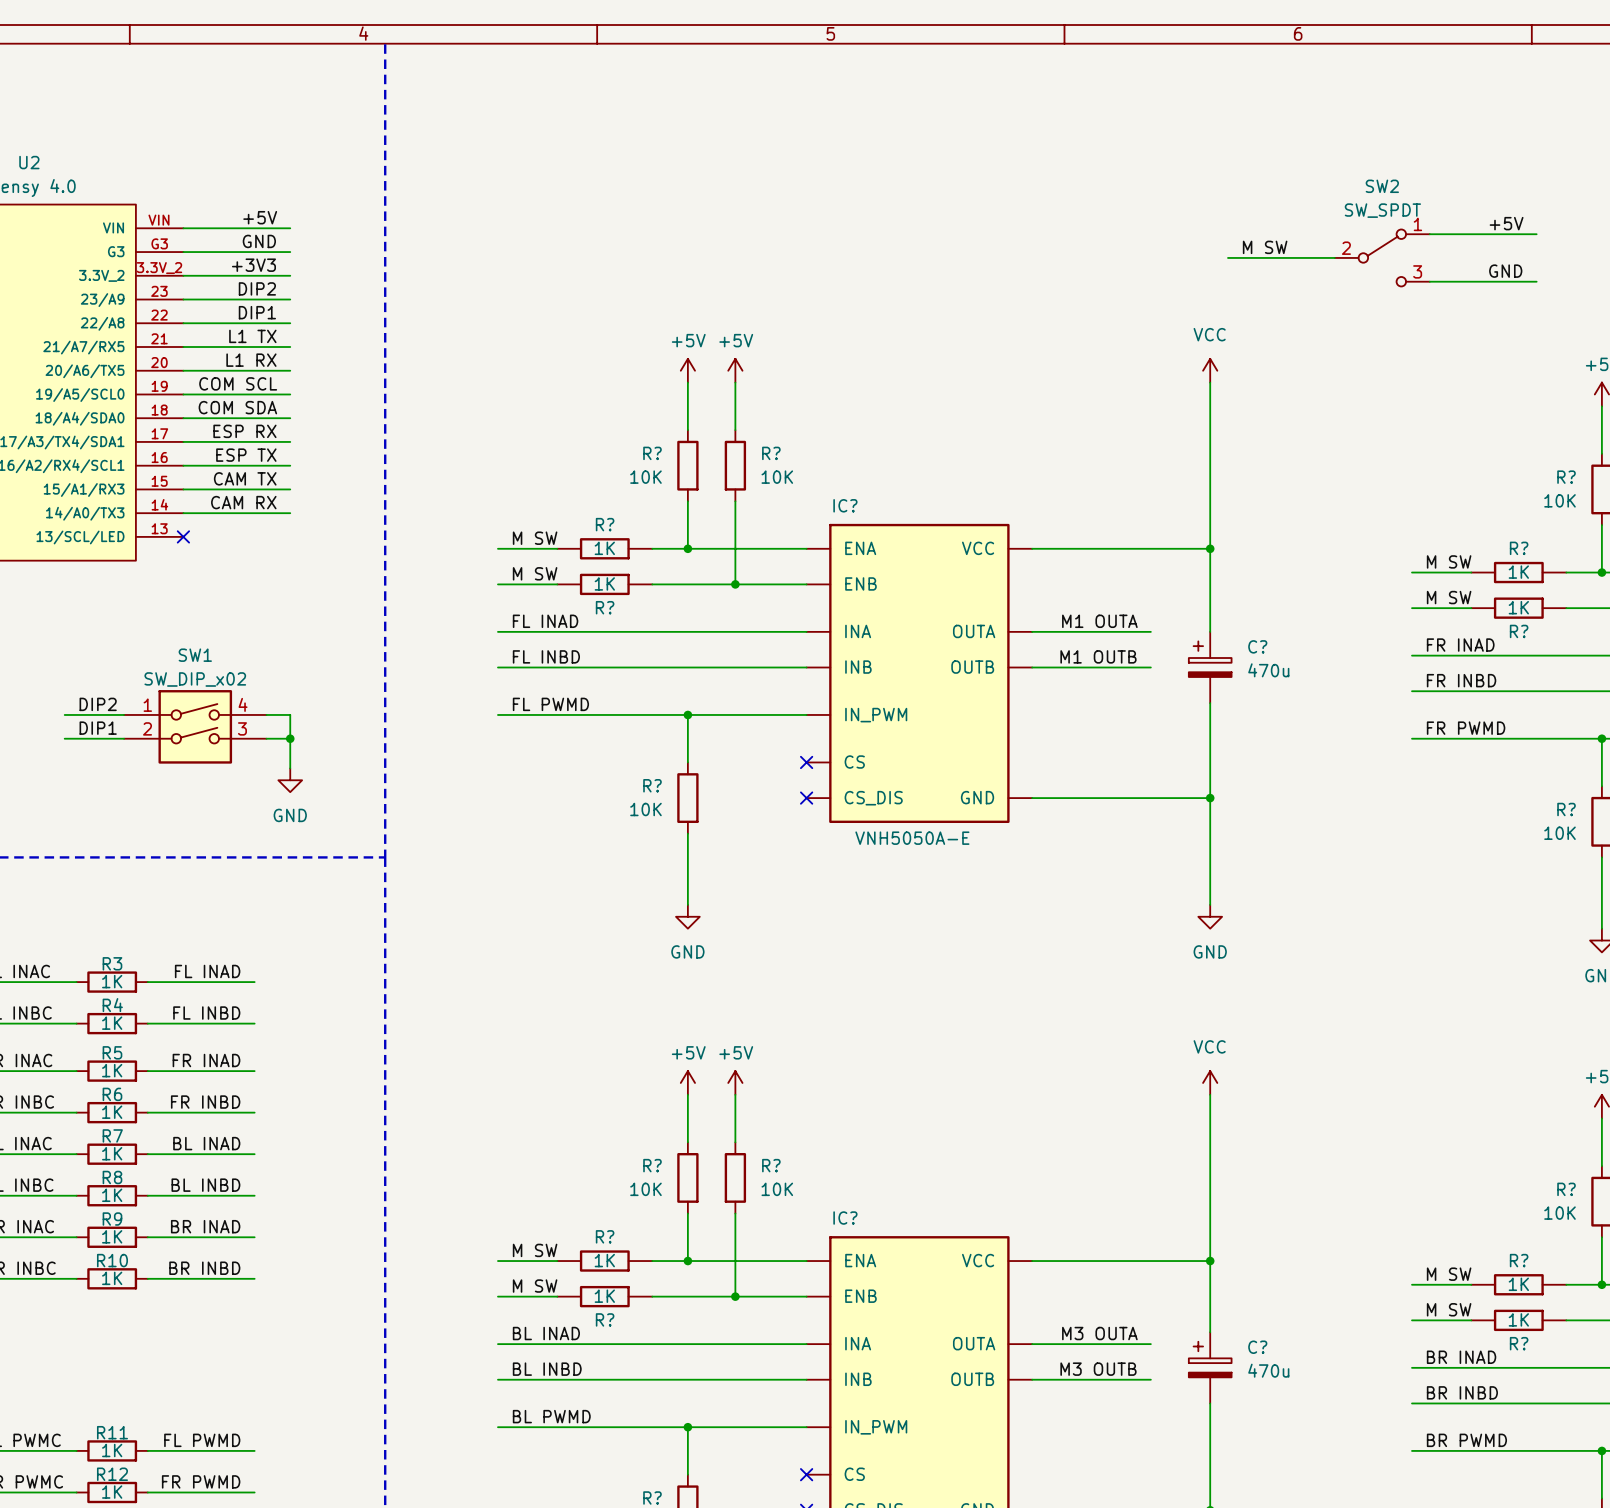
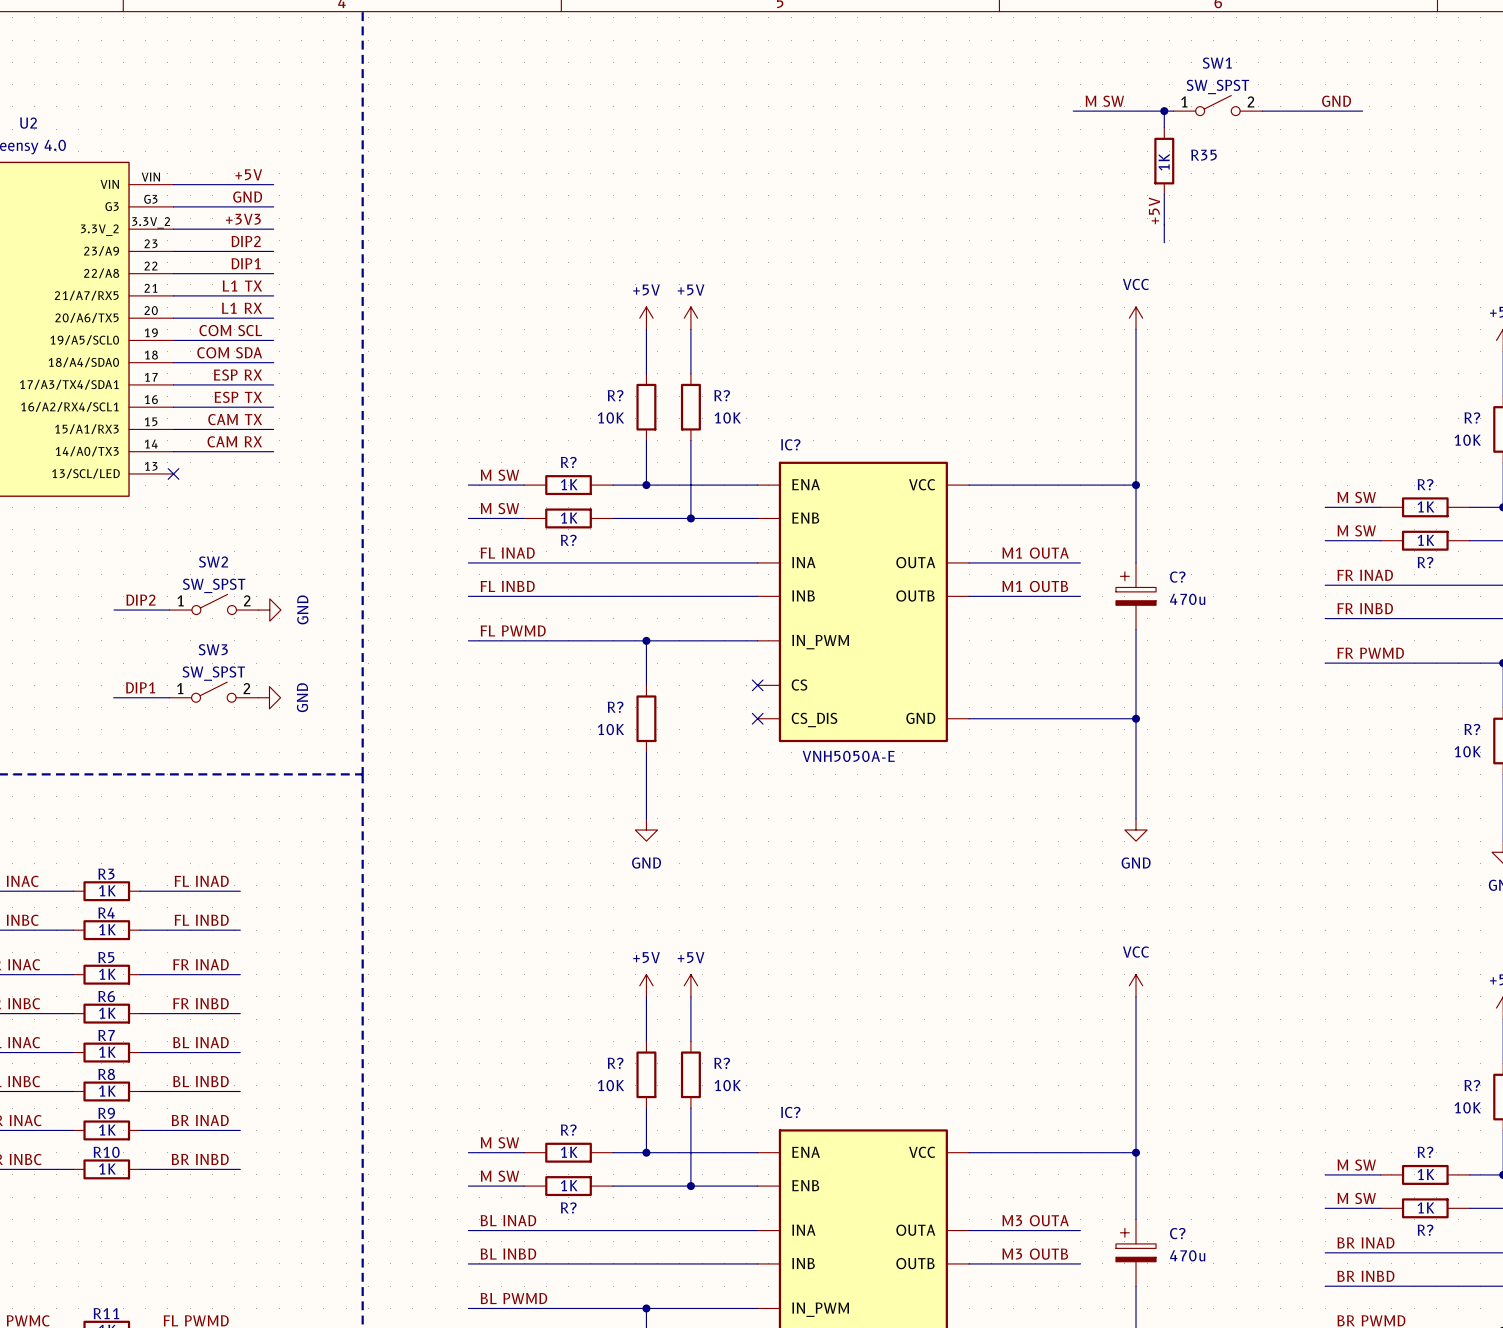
wire: none -> (1164, 111) (1164, 127)
junction: none -> (1164, 111)
SW2 name position: SW2 (1382, 186) -> SW2 (213, 562)
R35: none -> 1K (1164, 161)
SW2 value: SW_SPDT (1382, 210) -> SW_SPST (214, 585)
label: +5V (1506, 223) -> none
SW2 symbol: [1334, 229, 1430, 287] -> [169, 594, 259, 615]
wire: (1429, 234) (1536, 234) -> (1262, 111) (1362, 111)
wire: none -> (1164, 194) (1164, 242)
label position: M SW (1265, 247) -> M SW (1104, 101)
label: none -> +5V (1154, 210)
wire: (1228, 257) (1334, 257) -> (1073, 111) (1173, 111)
label position: GND (1505, 271) -> GND (1336, 101)
wire: (1429, 281) (1536, 281) -> none
SW1 name position: SW1 (195, 655) -> SW1 (1217, 63)
SW1 value: SW_DIP_x02 (195, 679) -> SW_SPST (1217, 86)
power symbol: none -> GND (269, 610)
SW1 symbol: [124, 690, 267, 764] -> [1173, 95, 1263, 116]
label position: DIP2 (98, 704) -> DIP2 (140, 600)
wire: (64, 714) (124, 714) -> (114, 610) (169, 610)
wire: (266, 714) (290, 714) (290, 768) -> none
label position: DIP1 (98, 728) -> DIP1 (140, 687)
wire: (64, 738) (124, 738) -> (113, 697) (169, 697)
wire: (266, 738) (290, 738) -> none
junction: (290, 738) -> none
SW3: none -> SW_SPST (213, 692)
power symbol rotation: 0° (290, 780) -> 90° counterclockwise (269, 697)

